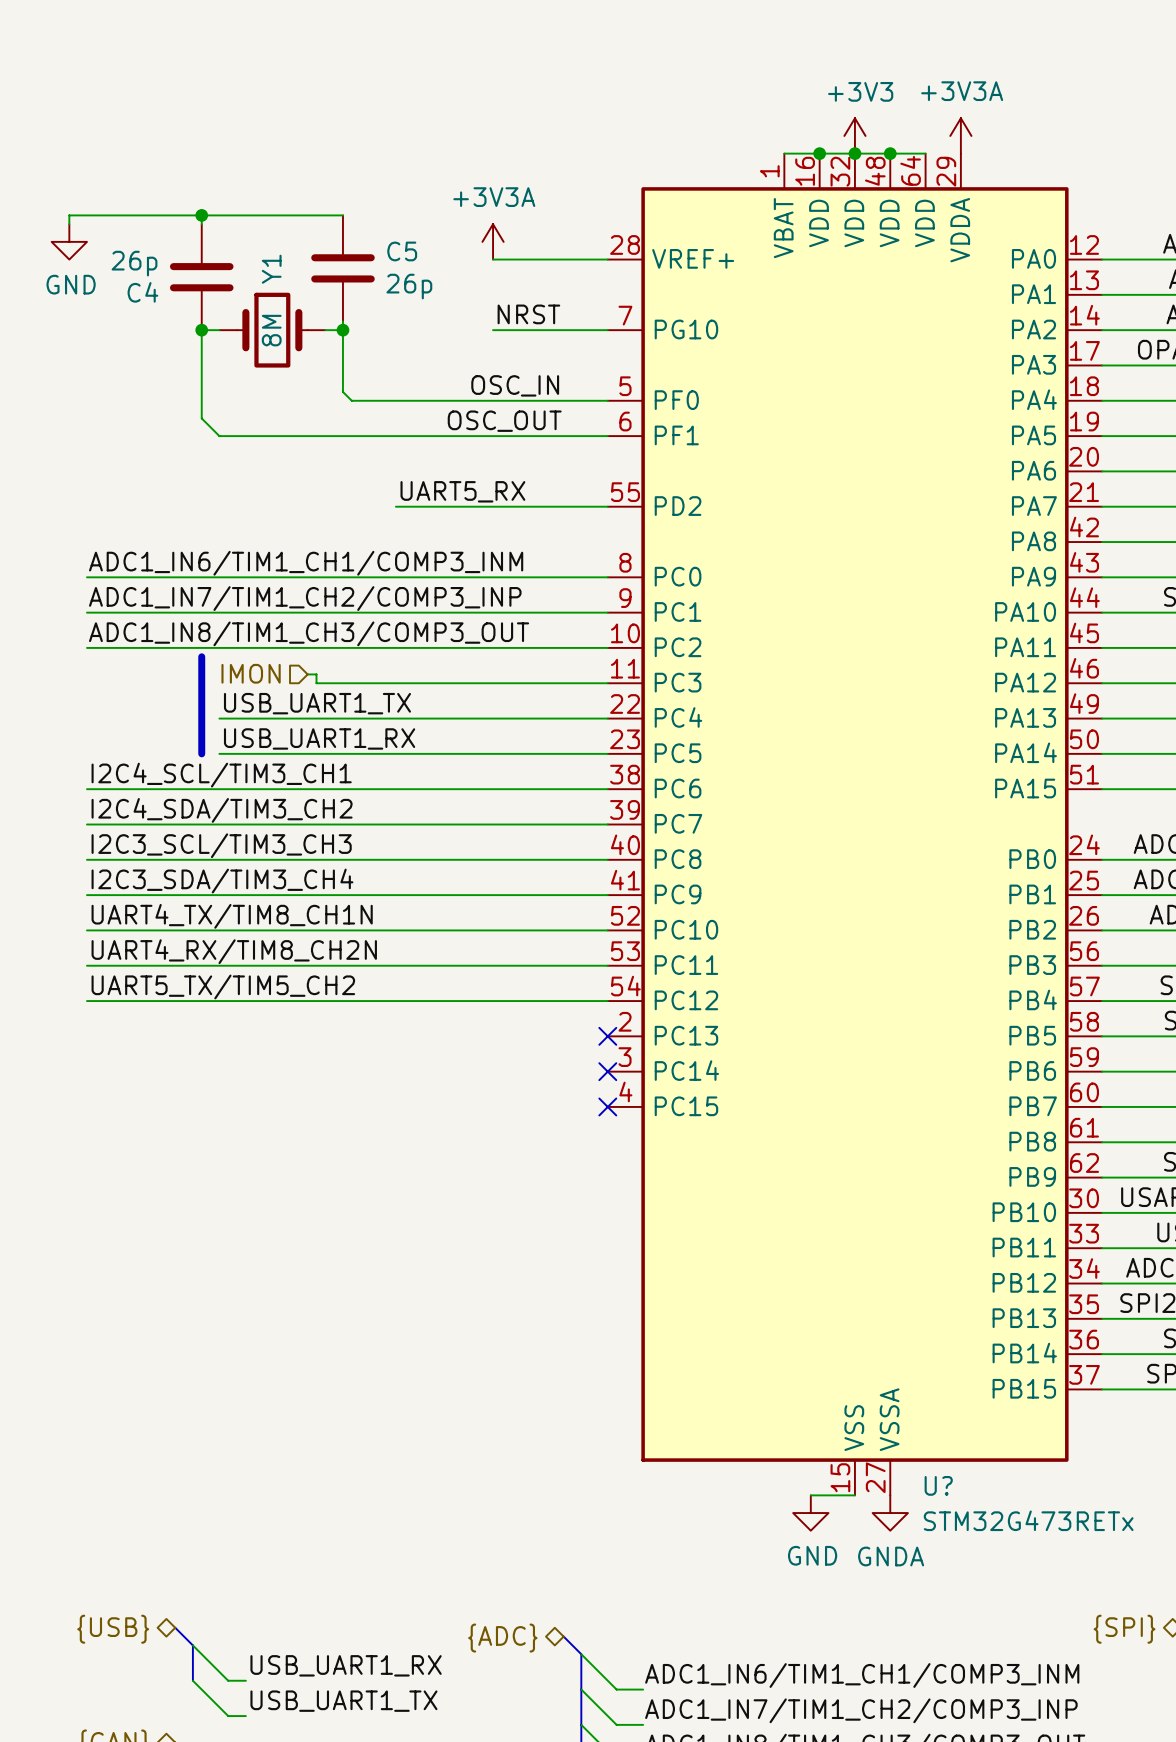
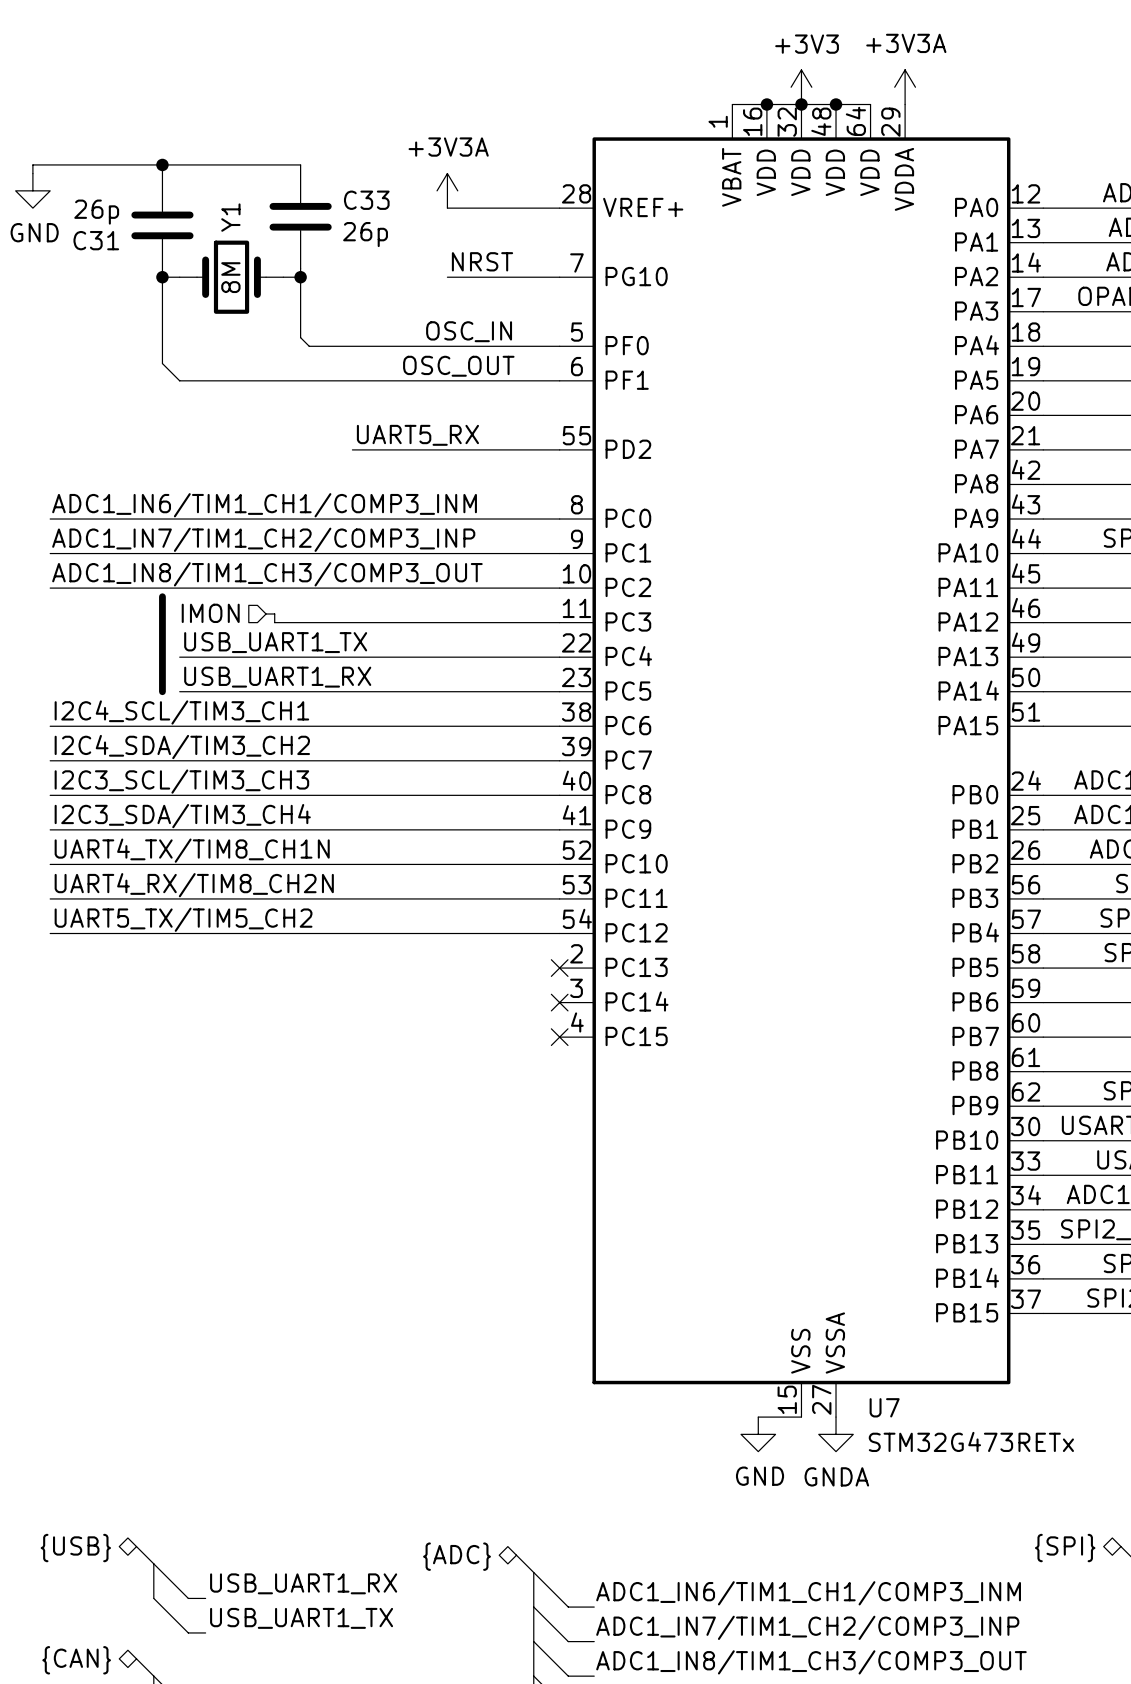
C5 name: C5 (402, 251) -> C33 (366, 200)
C4 name: C4 (142, 292) -> C31 (96, 240)
U? name: U? (938, 1485) -> U7 (884, 1407)

